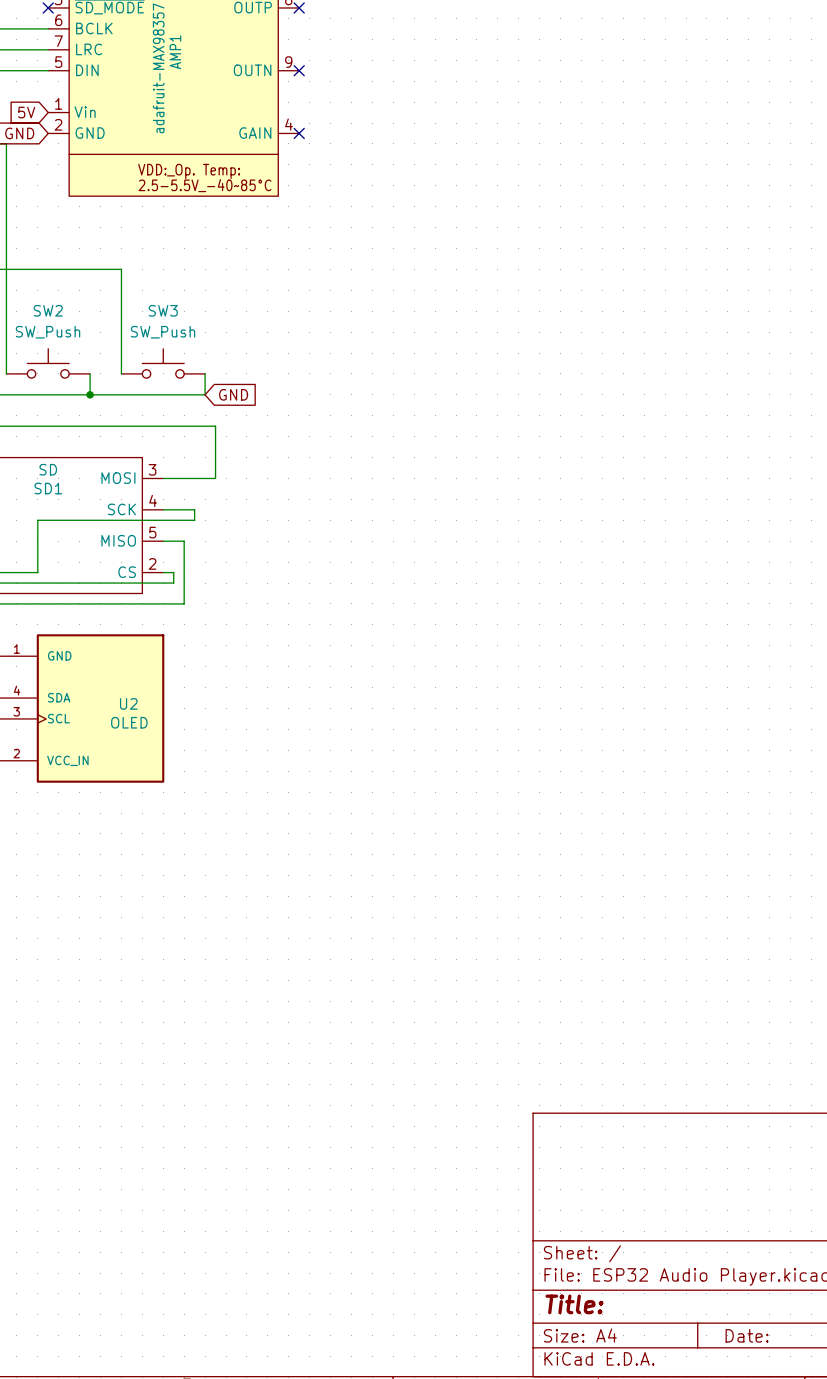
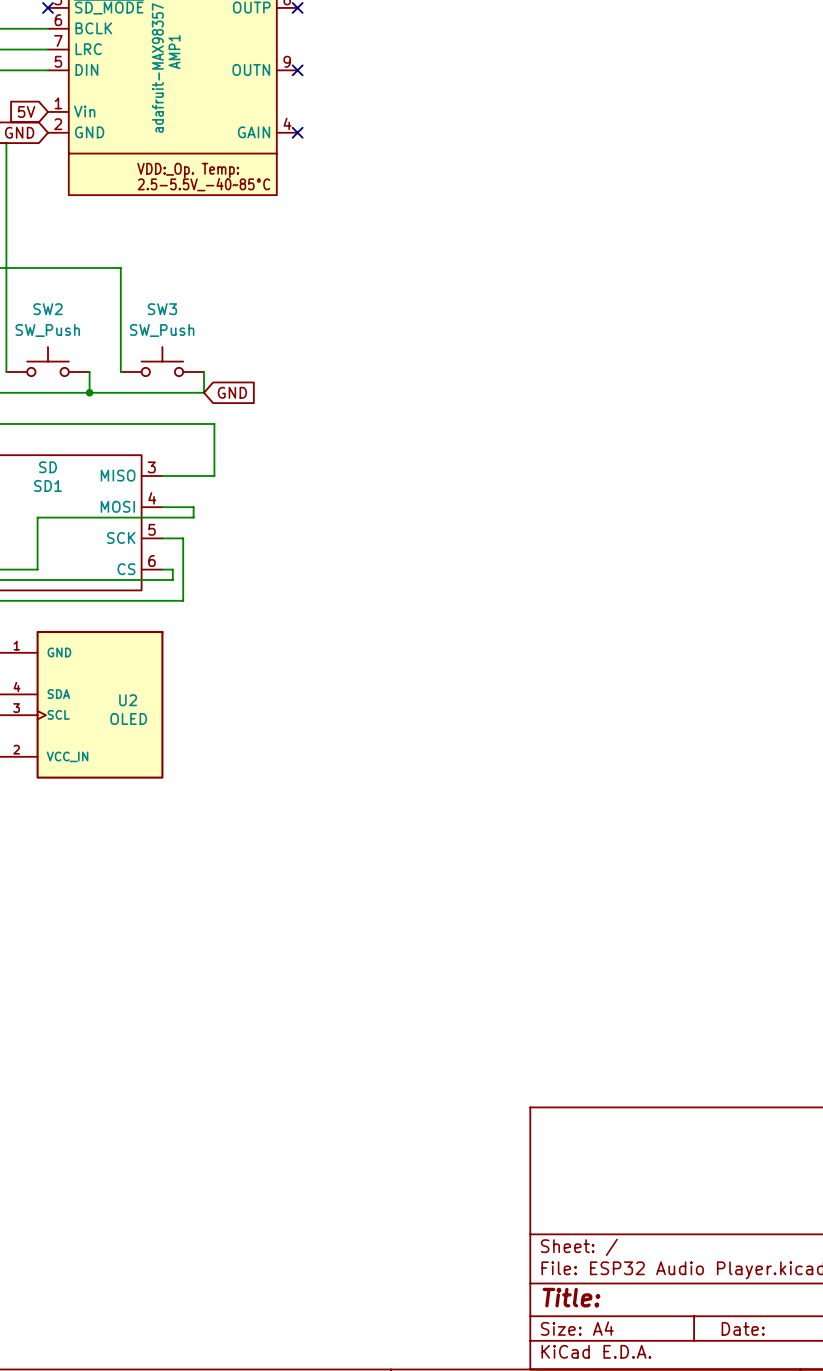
SD1 pin name: MOSI (118, 478) -> MISO (118, 475)
SD1 pin name: SCK (121, 509) -> MOSI (117, 506)
SD1 pin name: MISO (118, 540) -> SCK (121, 538)
SD1 pin number: 2 (152, 563) -> 6 (152, 561)

